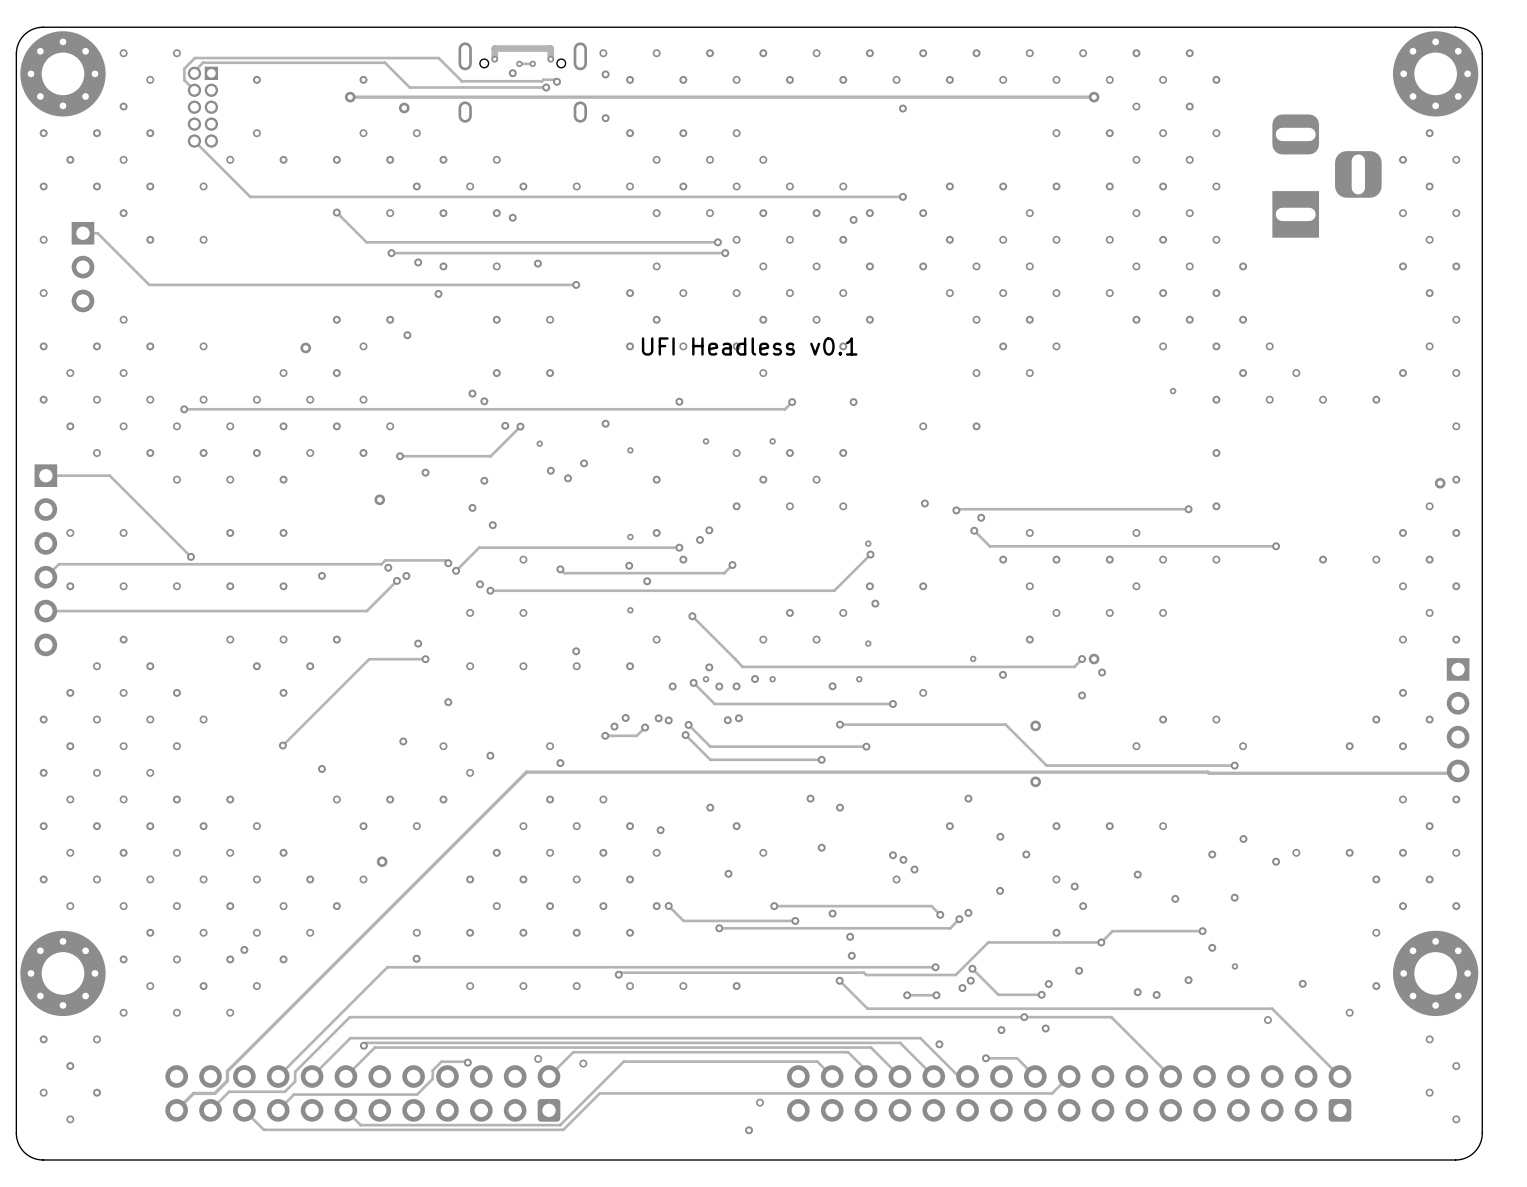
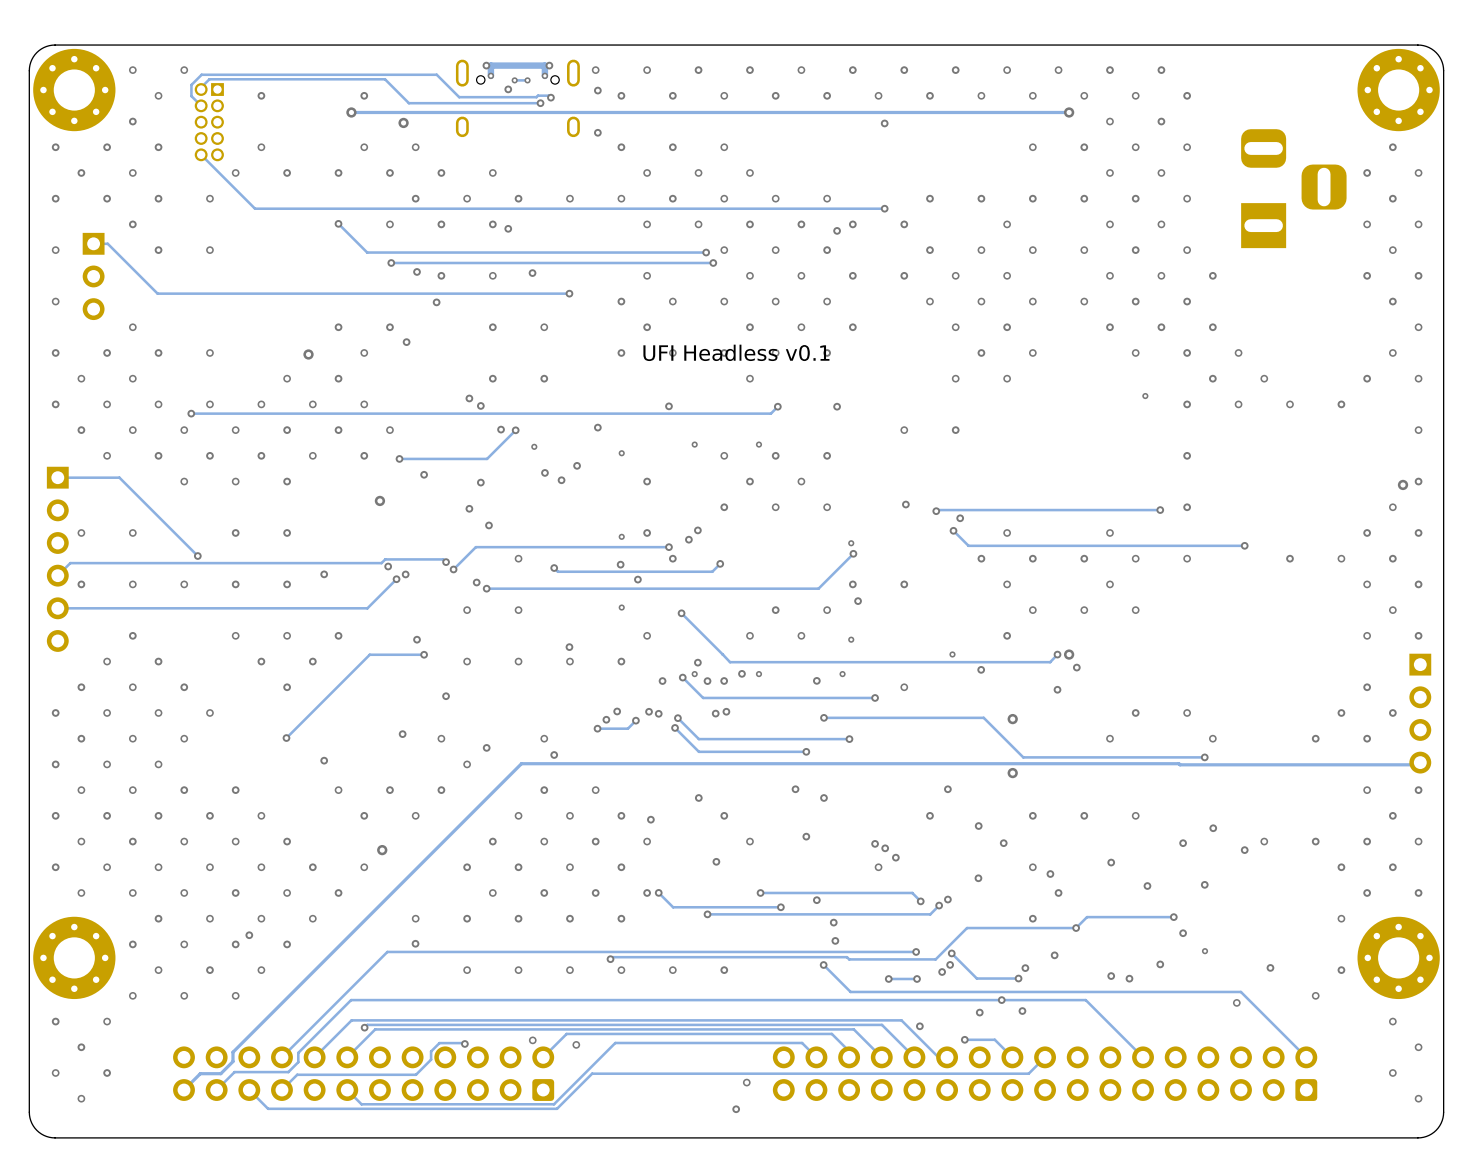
via: none -> (486, 65)
via: none -> (549, 65)

